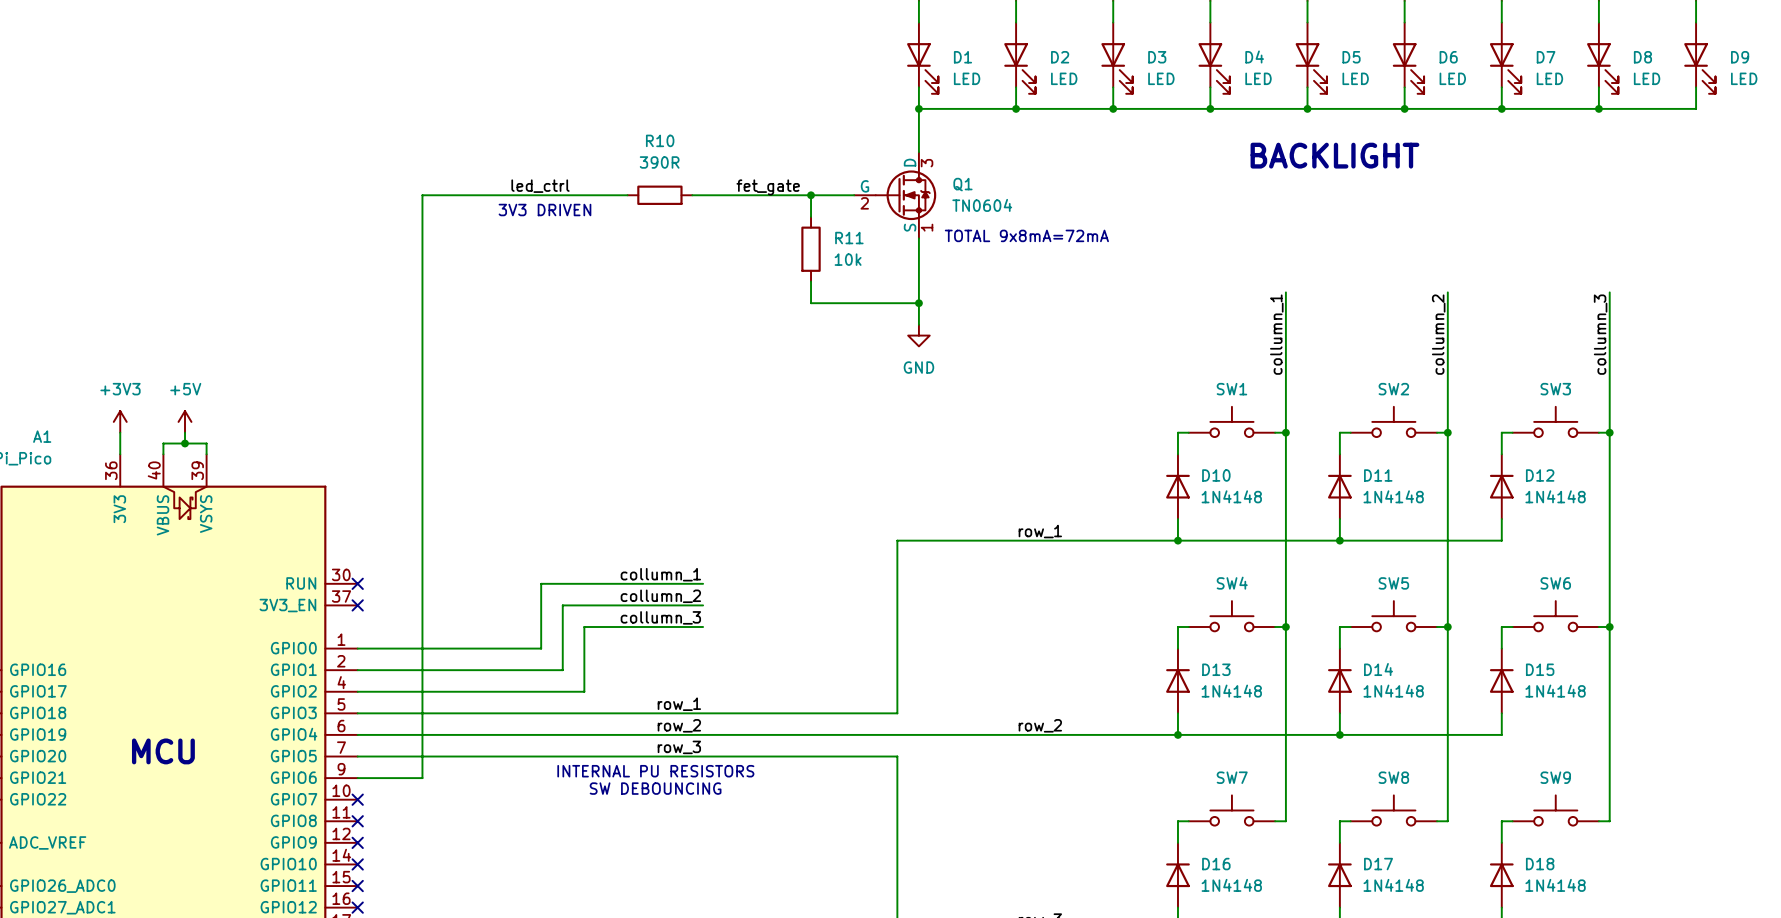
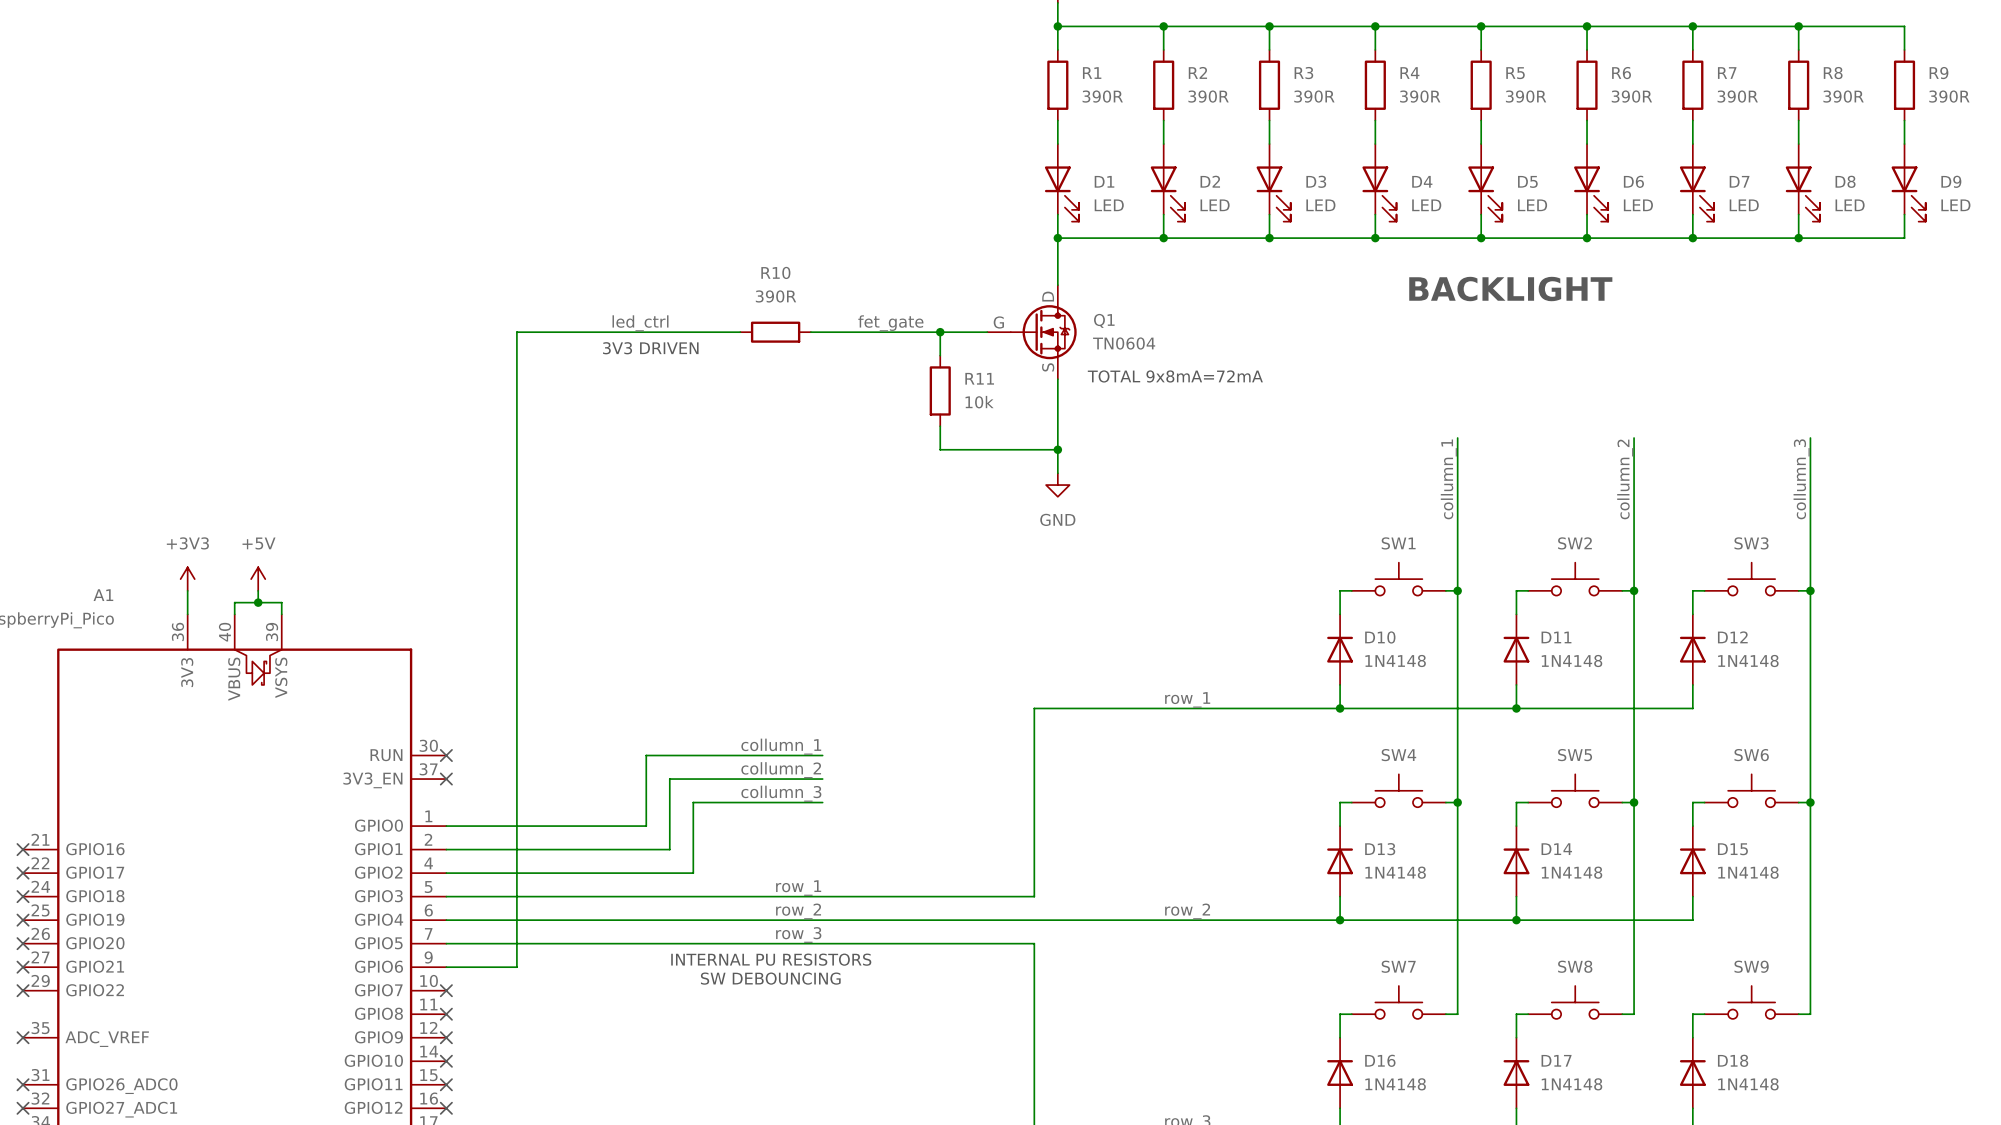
Q1 pin number: 3 (927, 163) -> none
Q1 pin number: 2 (864, 203) -> none
Q1 pin number: 1 (927, 227) -> none
text: MCU (163, 751) -> none

